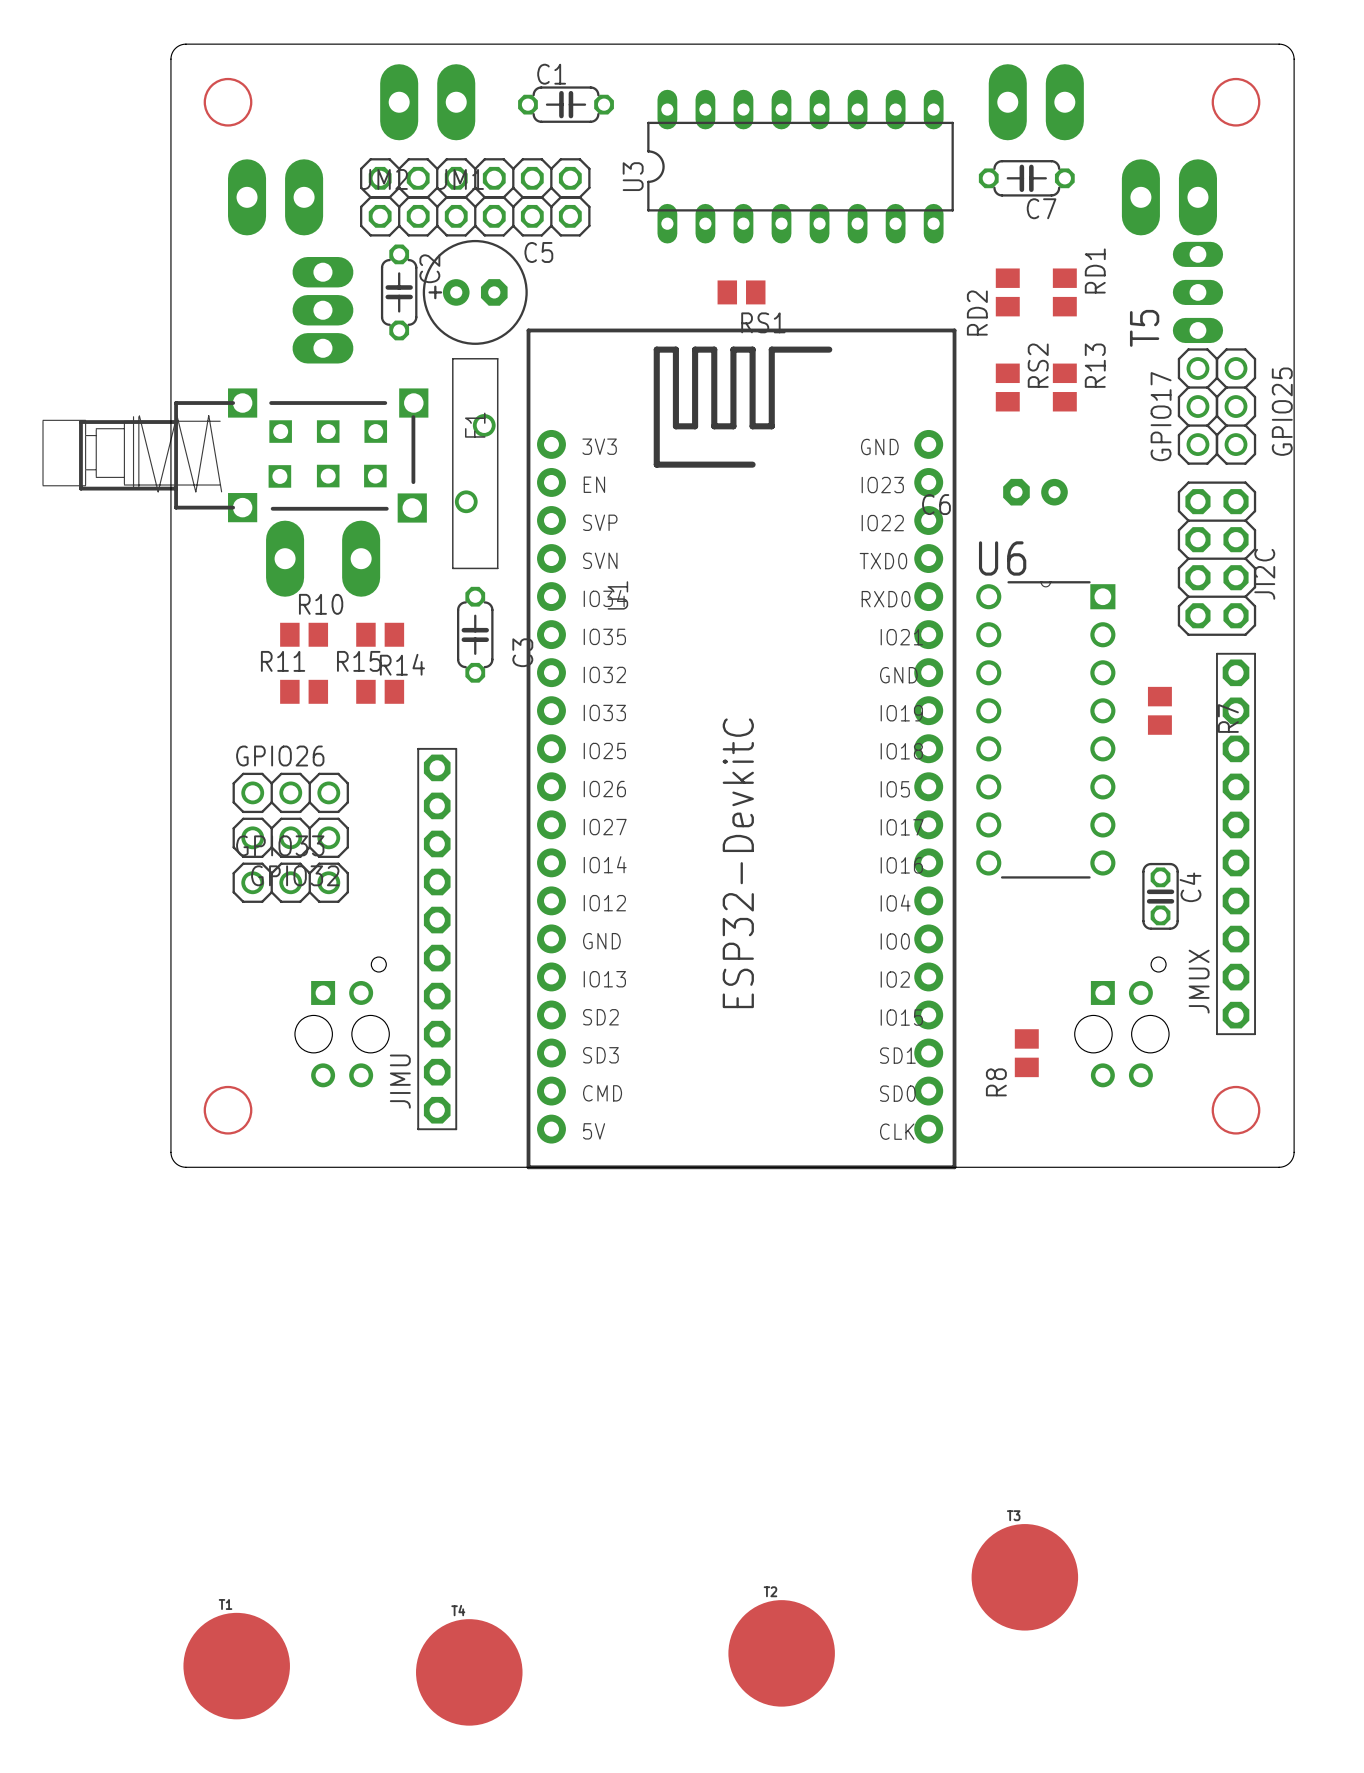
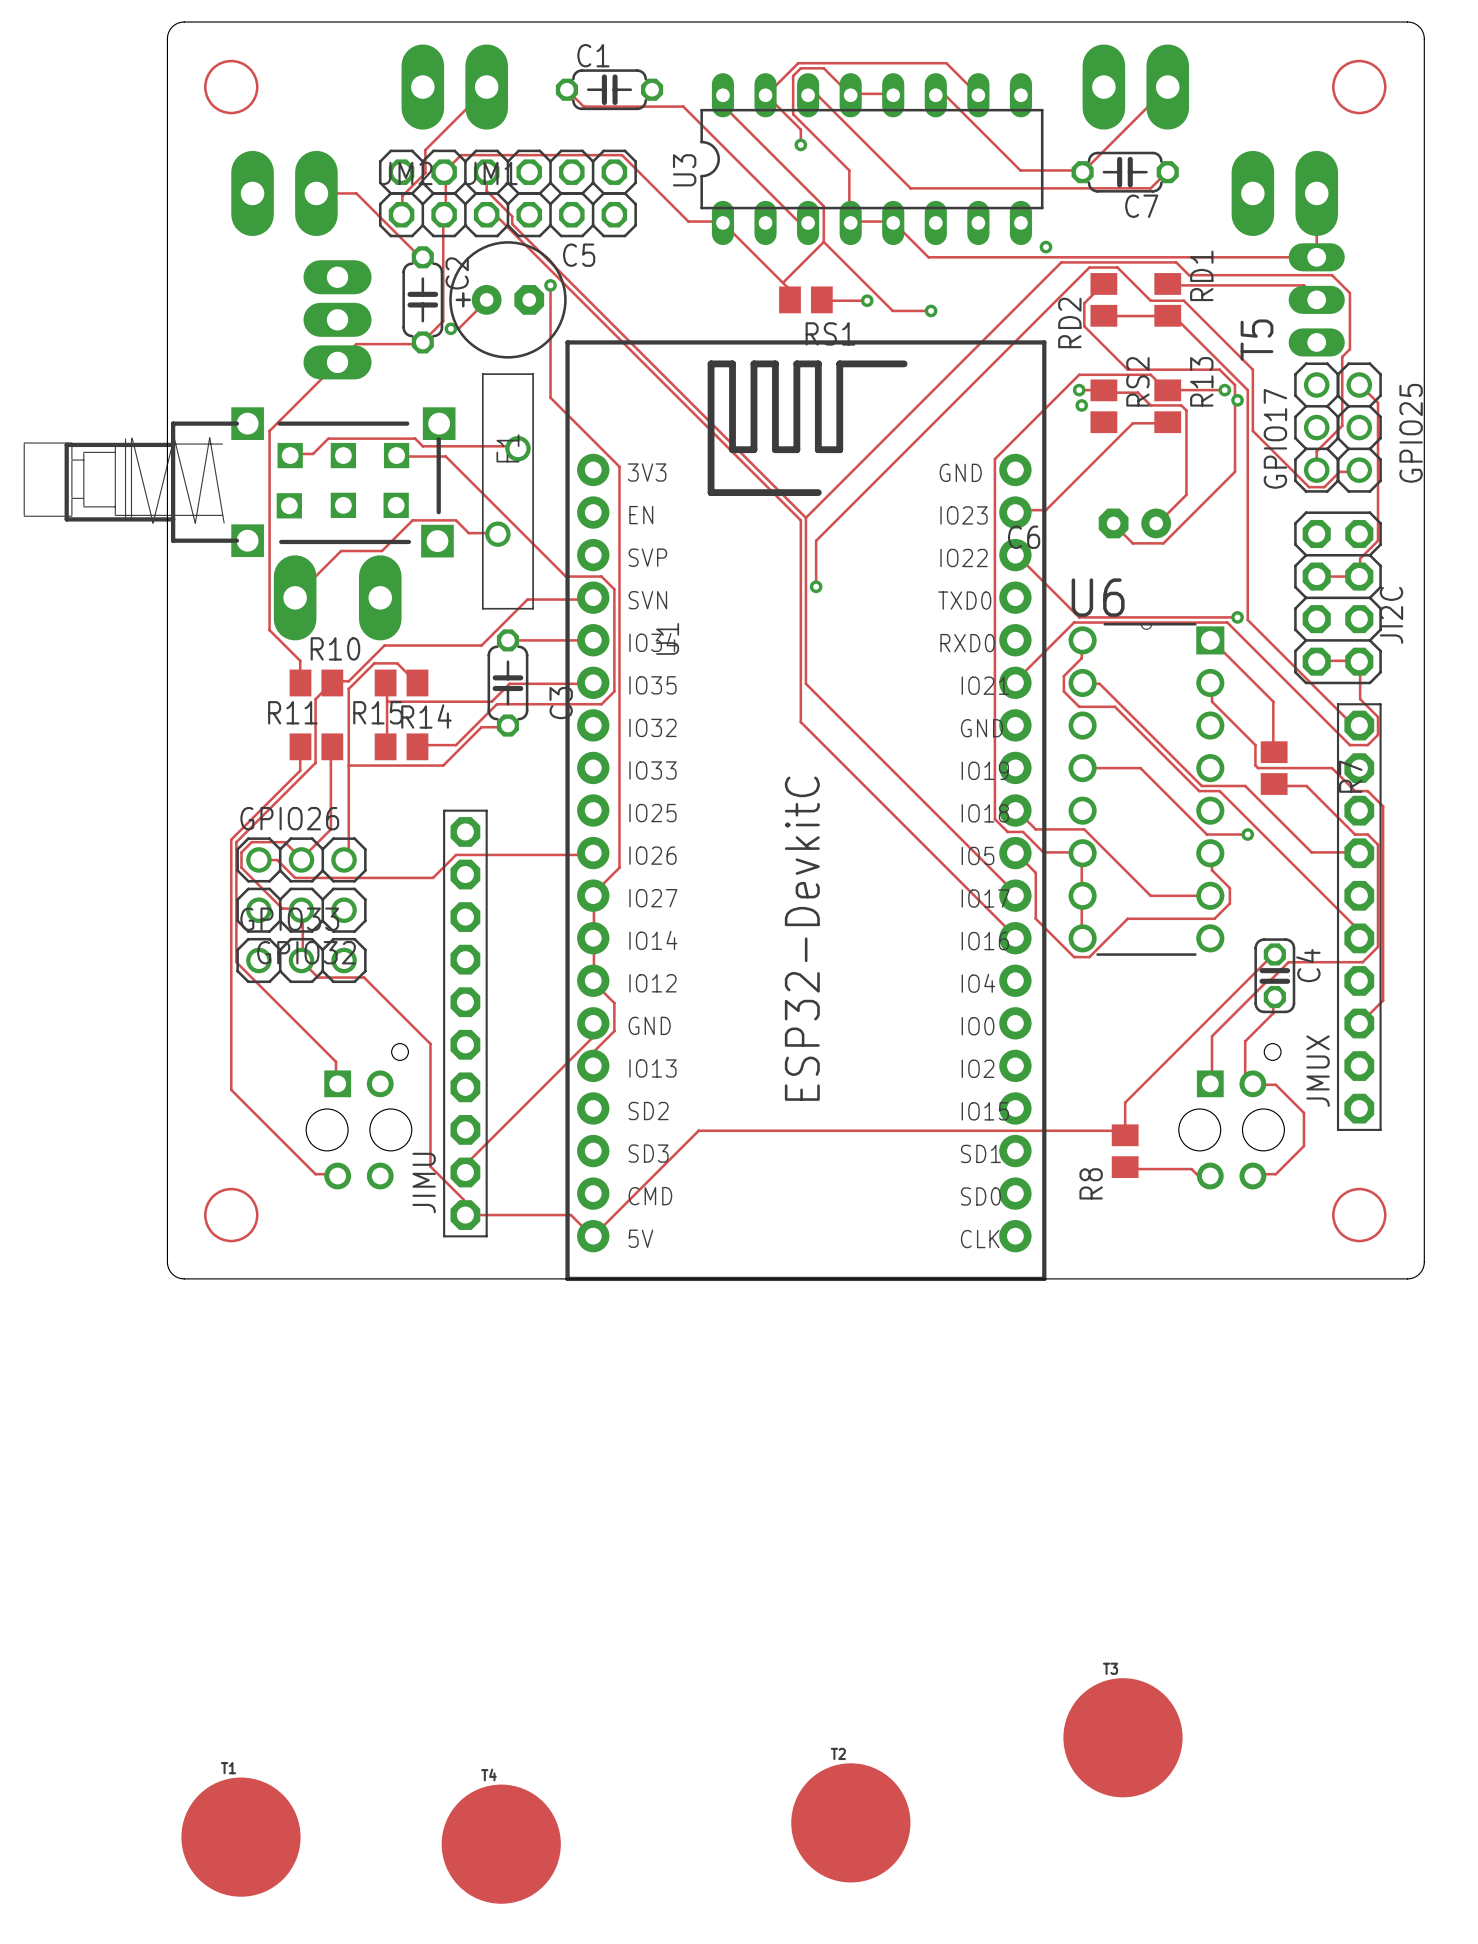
track: none -> (486, 87) (425, 150) (425, 173) (402, 196) (401, 214)
track: none -> (1167, 87) (1082, 172) (1081, 170) (1020, 170) (946, 96) (935, 95)
track: none -> (566, 89) (583, 106) (683, 106) (798, 221) (808, 222)
track: none -> (722, 95) (724, 106) (823, 206) (823, 241)
track: none -> (808, 95) (818, 96) (910, 188) (1150, 188) (1167, 172)
track: none -> (893, 95) (850, 95) (823, 68) (800, 68) (793, 75) (793, 114) (849, 170) (849, 221) (892, 221) (928, 257) (1316, 257) (1316, 193)
track: none -> (978, 95) (946, 63) (798, 63) (765, 95) (800, 129) (800, 144)
via: none -> (800, 144)
track: none -> (486, 172) (486, 190) (512, 216) (512, 224) (805, 517)
track: none -> (316, 193) (356, 193) (420, 257) (422, 257)
track: none -> (486, 214) (486, 216) (496, 216) (800, 520) (800, 722) (1015, 938)
track: none -> (823, 241) (782, 282)
track: none -> (823, 241) (892, 310) (931, 310)
via: none -> (1046, 247)
track: none -> (1103, 283) (1084, 303) (1084, 326) (1127, 369) (1219, 369) (1234, 385) (1234, 471) (1163, 543) (1132, 543) (1113, 523)
track: none -> (1167, 283) (1303, 285) (1316, 299)
track: none -> (550, 285) (550, 397) (619, 466) (619, 867) (593, 895) (593, 980) (614, 1003) (614, 1031) (593, 1051) (593, 1065)
via: none -> (550, 285)
track: none -> (486, 299) (458, 328) (450, 328)
track: none -> (790, 299) (788, 298) (788, 287) (721, 221) (688, 221) (622, 155) (461, 155) (444, 172) (445, 173) (445, 213) (443, 216) (443, 321) (422, 341) (422, 344) (356, 344) (269, 430) (269, 630) (300, 660) (300, 682)
track: none -> (821, 299) (867, 300)
via: none -> (867, 300)
via: none -> (931, 310)
track: none -> (1103, 315) (1173, 316) (1247, 390) (1247, 619) (1352, 724) (1359, 725)
via: none -> (450, 328)
track: none -> (1359, 385) (1378, 402) (1378, 540) (1360, 558) (1360, 576) (1316, 576)
track: none -> (1079, 390) (1137, 392) (1150, 405) (1181, 405) (1186, 410) (1186, 494) (1156, 523)
via: none -> (1079, 390)
track: none -> (1224, 390) (1166, 390) (1150, 374) (1079, 374) (994, 459) (994, 819) (1007, 831) (1023, 831) (1043, 852) (1082, 853) (1082, 938)
via: none -> (1224, 390)
via: none -> (1237, 400)
via: none -> (1081, 405)
track: none -> (1167, 422) (1132, 423) (1046, 510) (1017, 510) (1015, 512)
track: none -> (518, 448) (517, 446) (422, 446) (415, 438) (328, 438) (313, 453) (290, 455)
track: none -> (396, 455) (445, 456) (565, 576) (601, 576) (614, 589) (614, 691) (601, 704) (496, 704) (456, 745) (417, 745) (417, 746)
track: none -> (1316, 470) (1316, 451) (1342, 425) (1342, 356) (1349, 349) (1349, 293) (1332, 275) (1189, 275) (1176, 262) (1061, 262) (805, 517)
track: none -> (1359, 470) (1357, 471) (1339, 471) (1324, 487) (1309, 487) (1252, 430) (1252, 369) (1183, 300) (1150, 300) (1117, 267) (1089, 267) (816, 540) (816, 586)
track: none -> (805, 517) (805, 683) (1015, 893) (1015, 895)
track: none -> (497, 534) (468, 533) (456, 520) (412, 520) (381, 551) (341, 551) (295, 597)
track: none -> (1015, 555) (1079, 617) (1237, 617)
via: none -> (816, 586)
track: none -> (593, 597) (591, 599) (527, 599) (481, 645) (384, 645) (348, 681) (333, 681) (315, 699) (315, 763) (236, 842) (236, 962) (335, 1061) (335, 1082) (337, 1083)
via: none -> (1237, 617)
track: none -> (593, 640) (507, 640)
track: none -> (1082, 640) (1081, 658) (1063, 676) (1063, 691) (1079, 706) (1114, 706) (1199, 791) (1219, 791) (1357, 929) (1359, 938)
track: none -> (1210, 640) (1273, 701) (1274, 752)
track: none -> (1316, 661) (1359, 661) (1360, 699) (1378, 717) (1378, 734) (1367, 745) (1349, 745) (1227, 622) (1074, 622) (1015, 682)
track: none -> (385, 682) (385, 746)
track: none -> (417, 682) (397, 663) (374, 663) (348, 688) (348, 854) (344, 859)
track: none -> (593, 682) (509, 683) (491, 701) (387, 701)
track: none -> (1082, 682) (1099, 683) (1201, 785) (1245, 785) (1311, 852) (1359, 853)
track: none -> (1210, 682) (1212, 683) (1212, 701) (1255, 745) (1255, 765) (1257, 768) (1332, 768) (1355, 791) (1367, 791) (1383, 806) (1383, 1000) (1359, 1023)
track: none -> (507, 725) (507, 727) (481, 727) (443, 765) (348, 765)
track: none -> (300, 746) (300, 770) (231, 839) (231, 1089) (315, 1174) (335, 1174) (337, 1176)
track: none -> (332, 746) (330, 829) (301, 859) (284, 842) (251, 842) (241, 852) (241, 867) (282, 908) (300, 908) (302, 911) (301, 960) (318, 977) (364, 977) (430, 1043) (430, 1166) (463, 1199) (463, 1215) (570, 1215) (593, 1236) (698, 1130) (1125, 1130)
track: none -> (1082, 768) (1140, 768) (1206, 834) (1247, 834)
track: none -> (1274, 784) (1275, 785) (1306, 785) (1355, 834) (1367, 834) (1378, 844) (1378, 946) (1362, 962) (1288, 962) (1212, 1036) (1212, 1082) (1210, 1083)
track: none -> (1015, 810) (1035, 829) (1084, 829) (1150, 895) (1210, 895)
via: none -> (1247, 834)
track: none -> (593, 853) (591, 854) (456, 854) (433, 877) (295, 877) (277, 860) (258, 859)
track: none -> (1015, 853) (1035, 872) (1035, 918) (1074, 957) (1089, 957) (1127, 918) (1214, 918) (1229, 903) (1229, 888) (1212, 870) (1212, 854) (1210, 853)
track: none -> (1274, 954) (1125, 1102) (1125, 1135)
track: none -> (1274, 997) (1273, 1013) (1245, 1041) (1245, 1074) (1252, 1082) (1252, 1084) (1275, 1084) (1303, 1112) (1303, 1146) (1275, 1174) (1252, 1174) (1252, 1176)
track: none -> (593, 1023) (591, 1023) (591, 1038) (466, 1163) (465, 1172)
track: none -> (1125, 1167) (1125, 1169) (1191, 1169) (1196, 1174) (1209, 1174) (1210, 1176)

